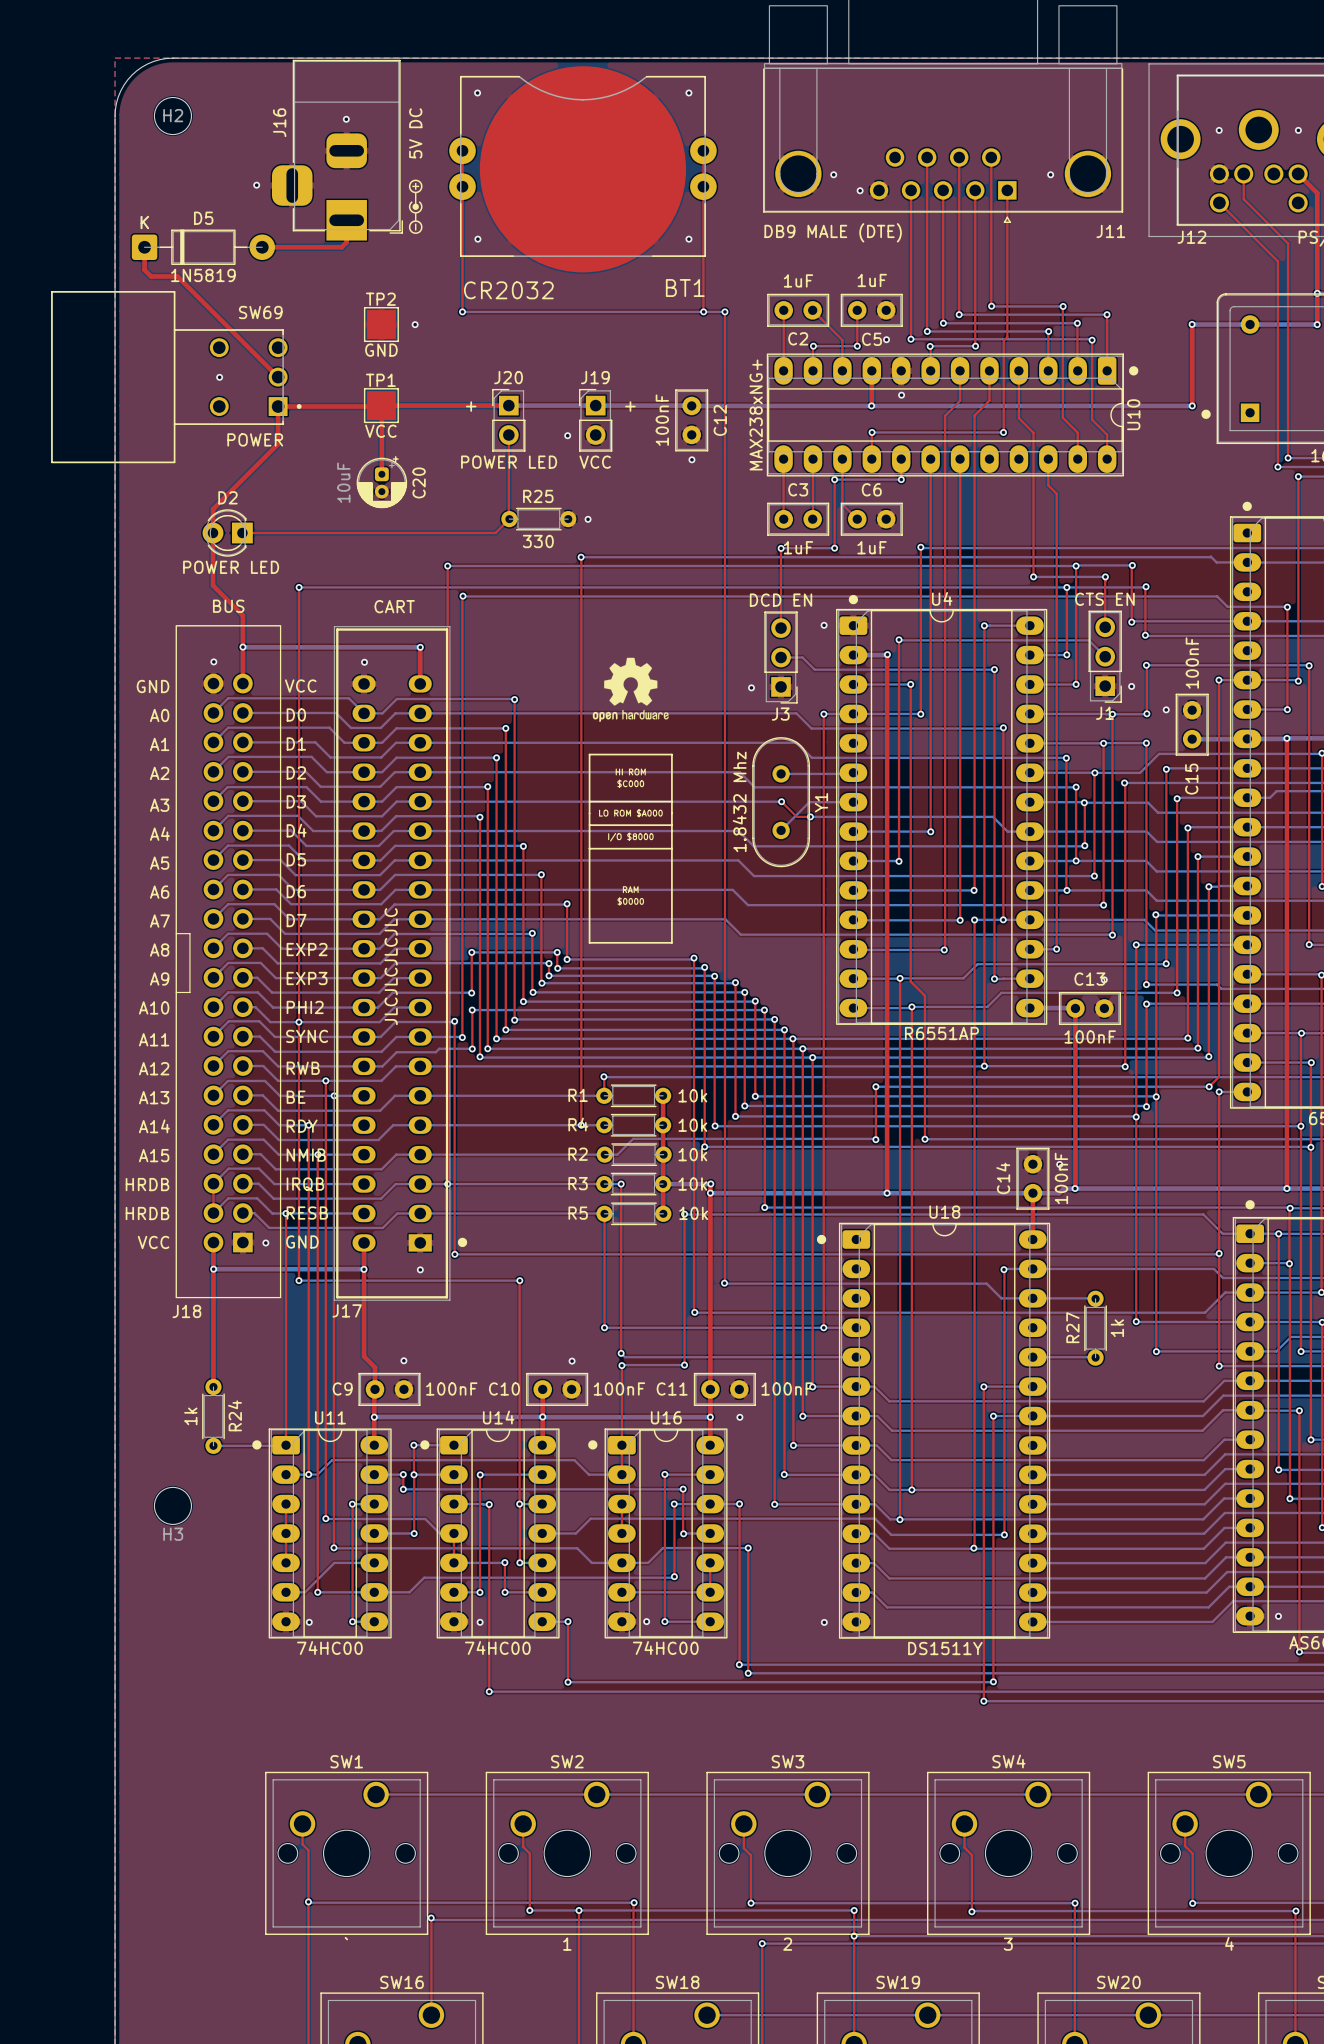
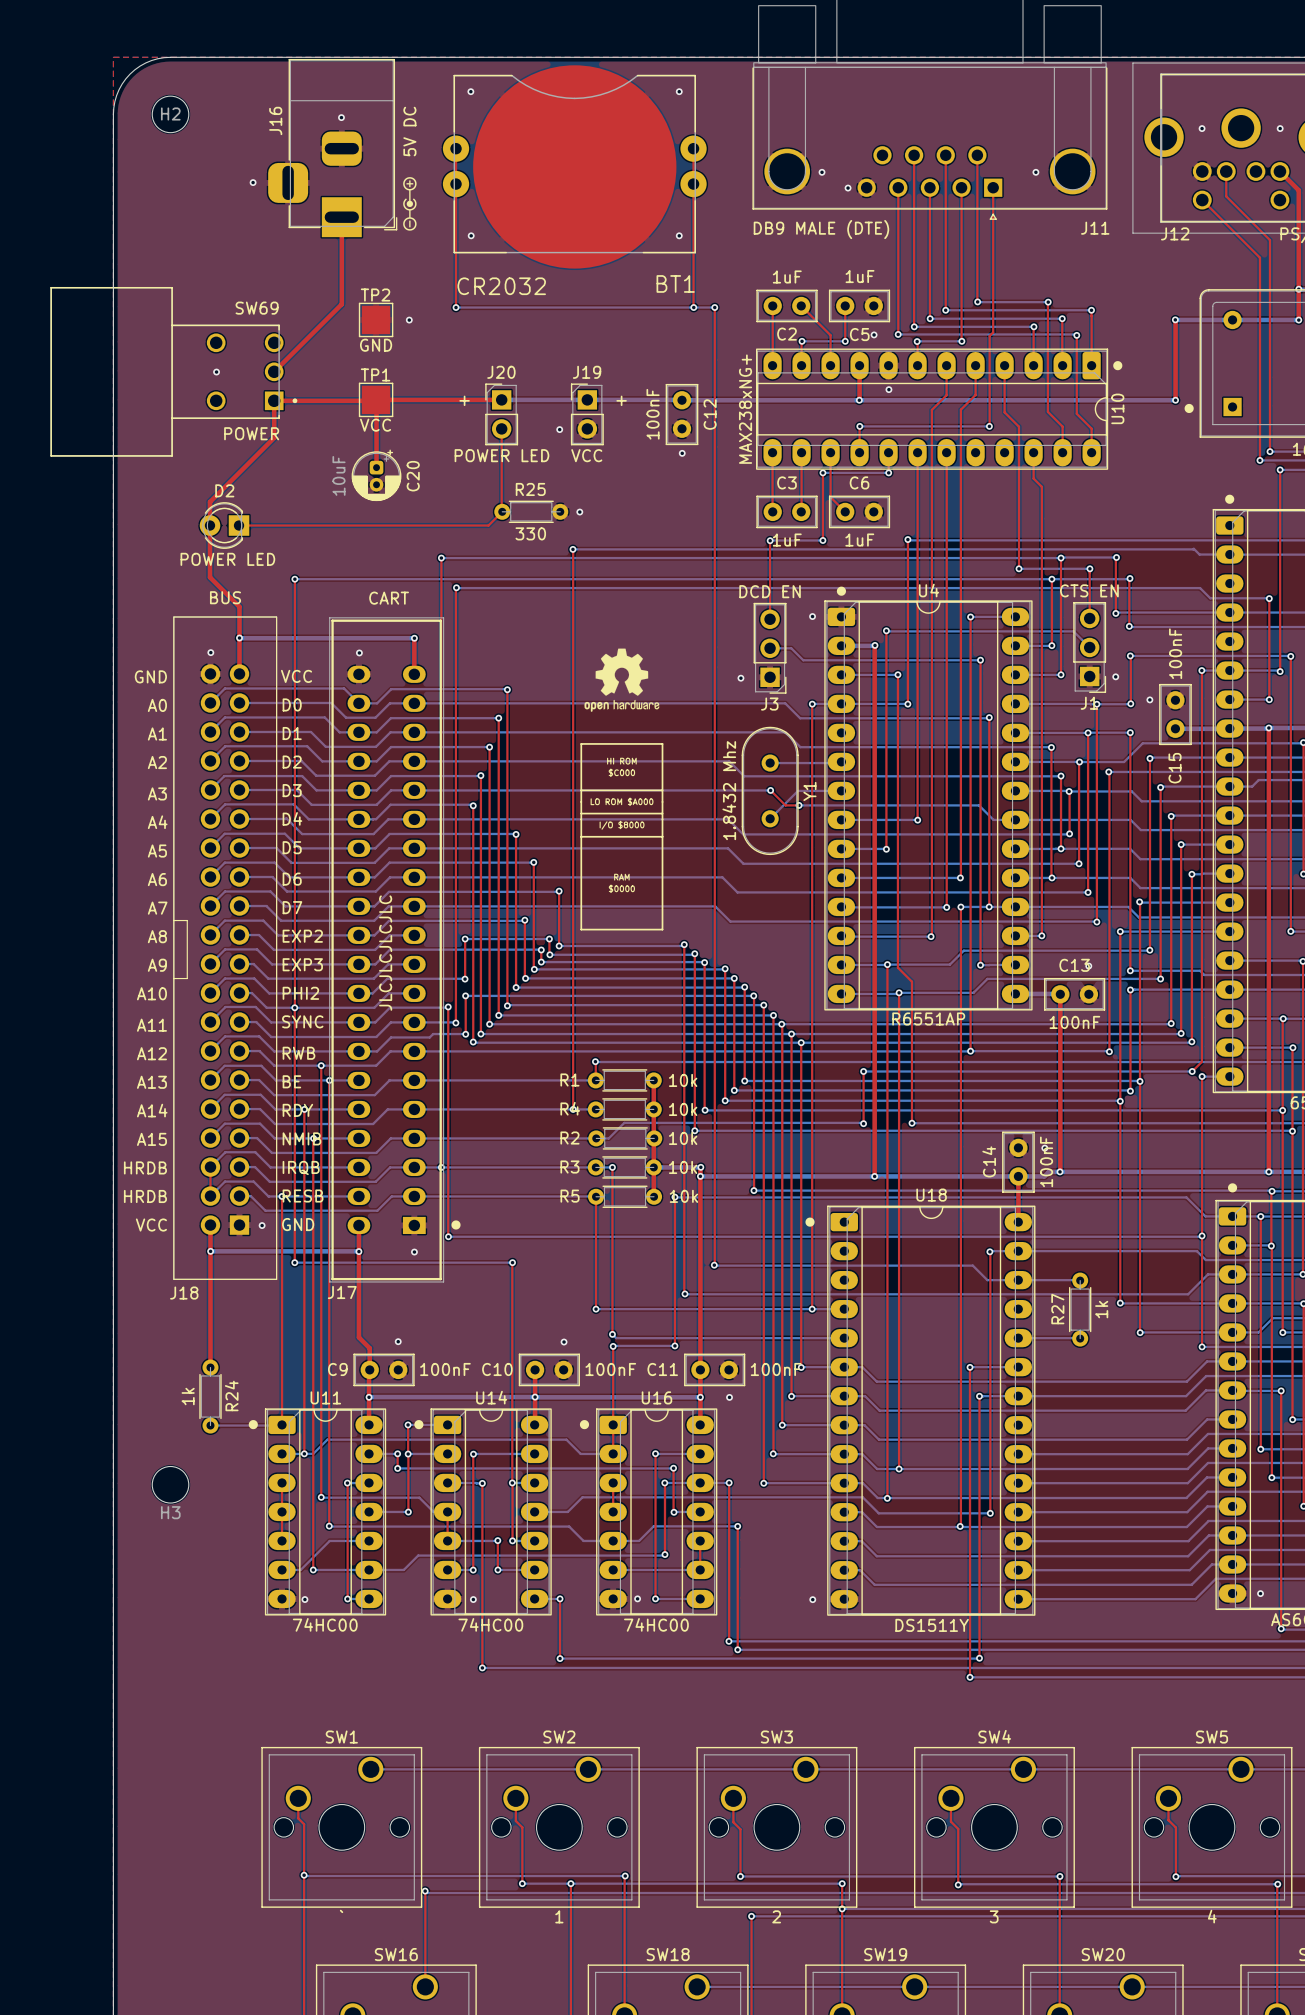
top track: (346, 242) (341, 247) (262, 247) -> (341, 238) (341, 304) (274, 371)
top track: (144, 247) (144, 269) (151, 276) (177, 276) (278, 377) -> none
D5: 1N5819 (203, 247) -> none

